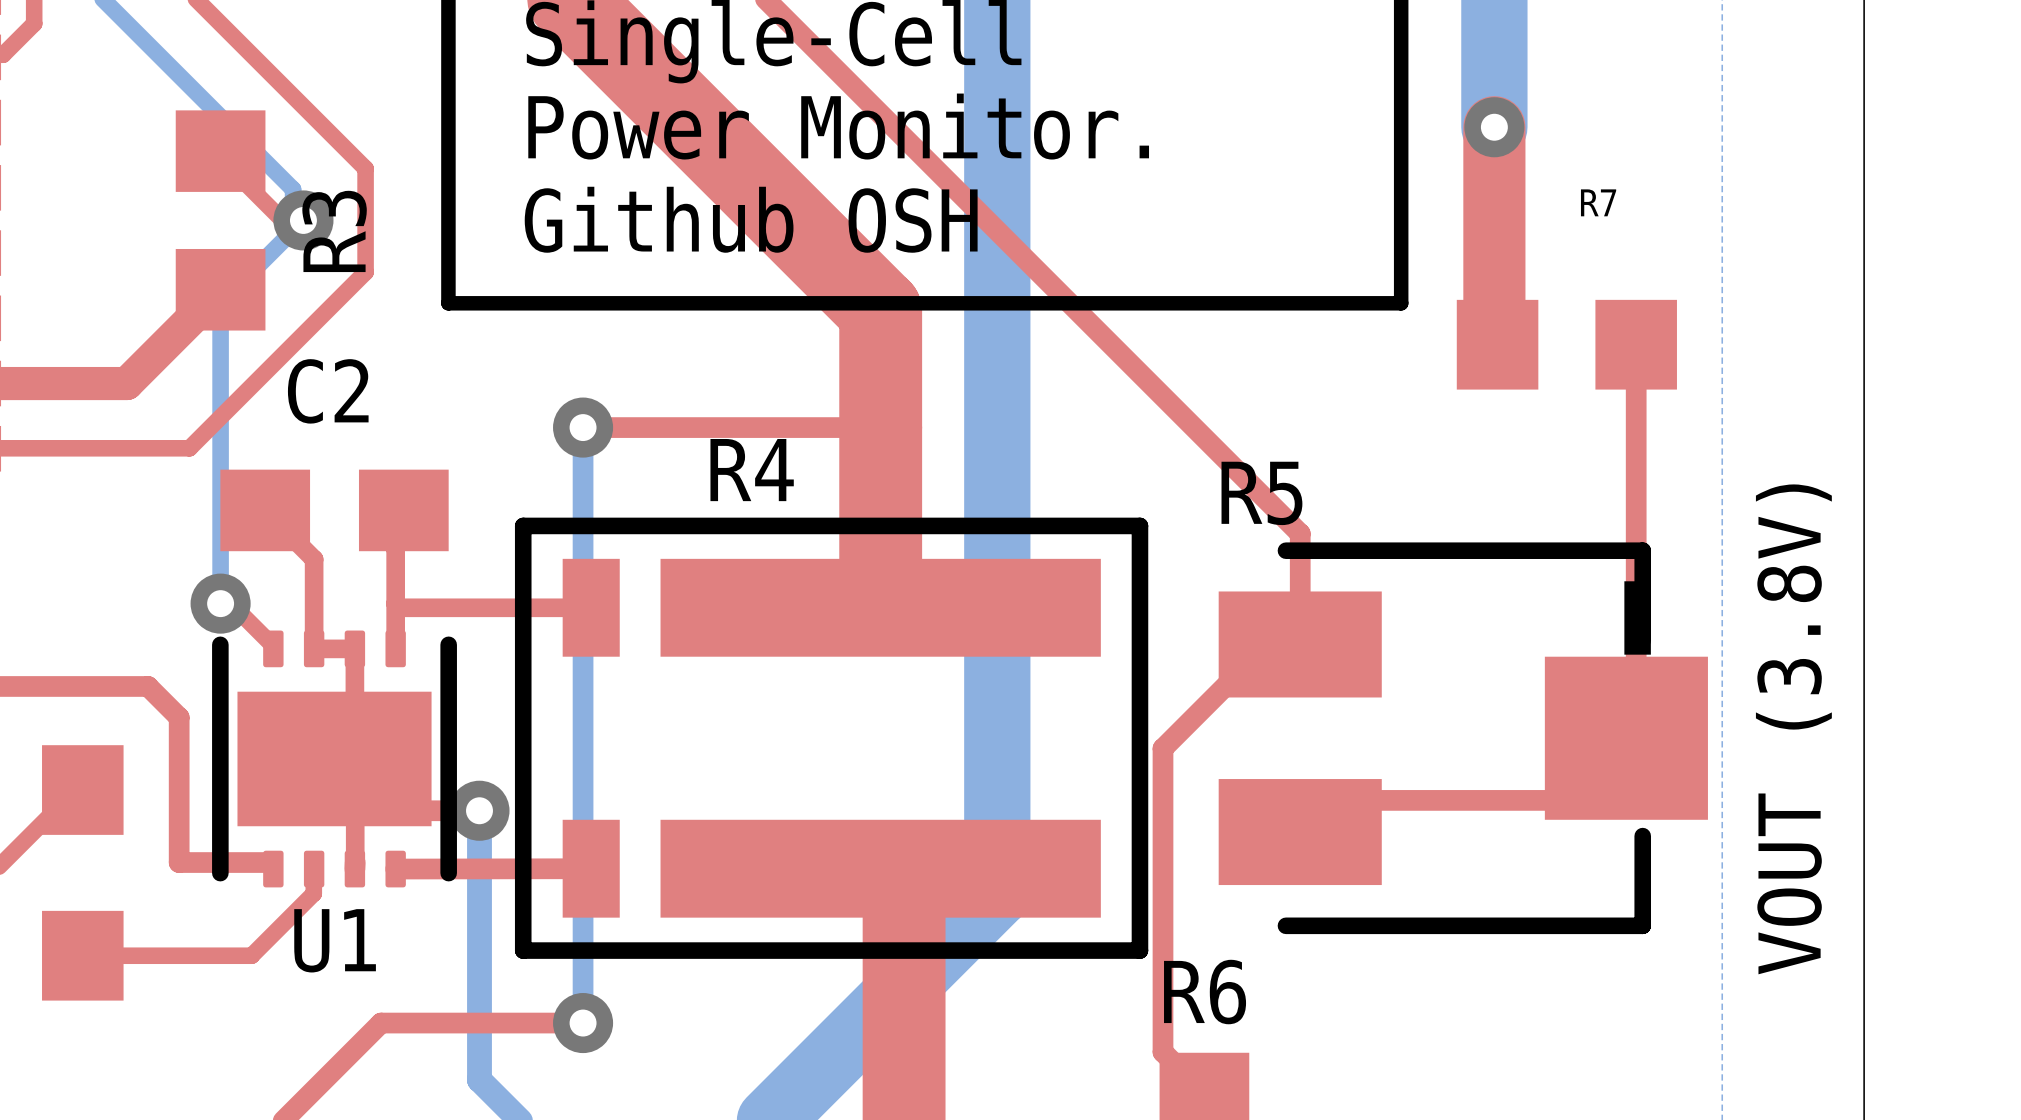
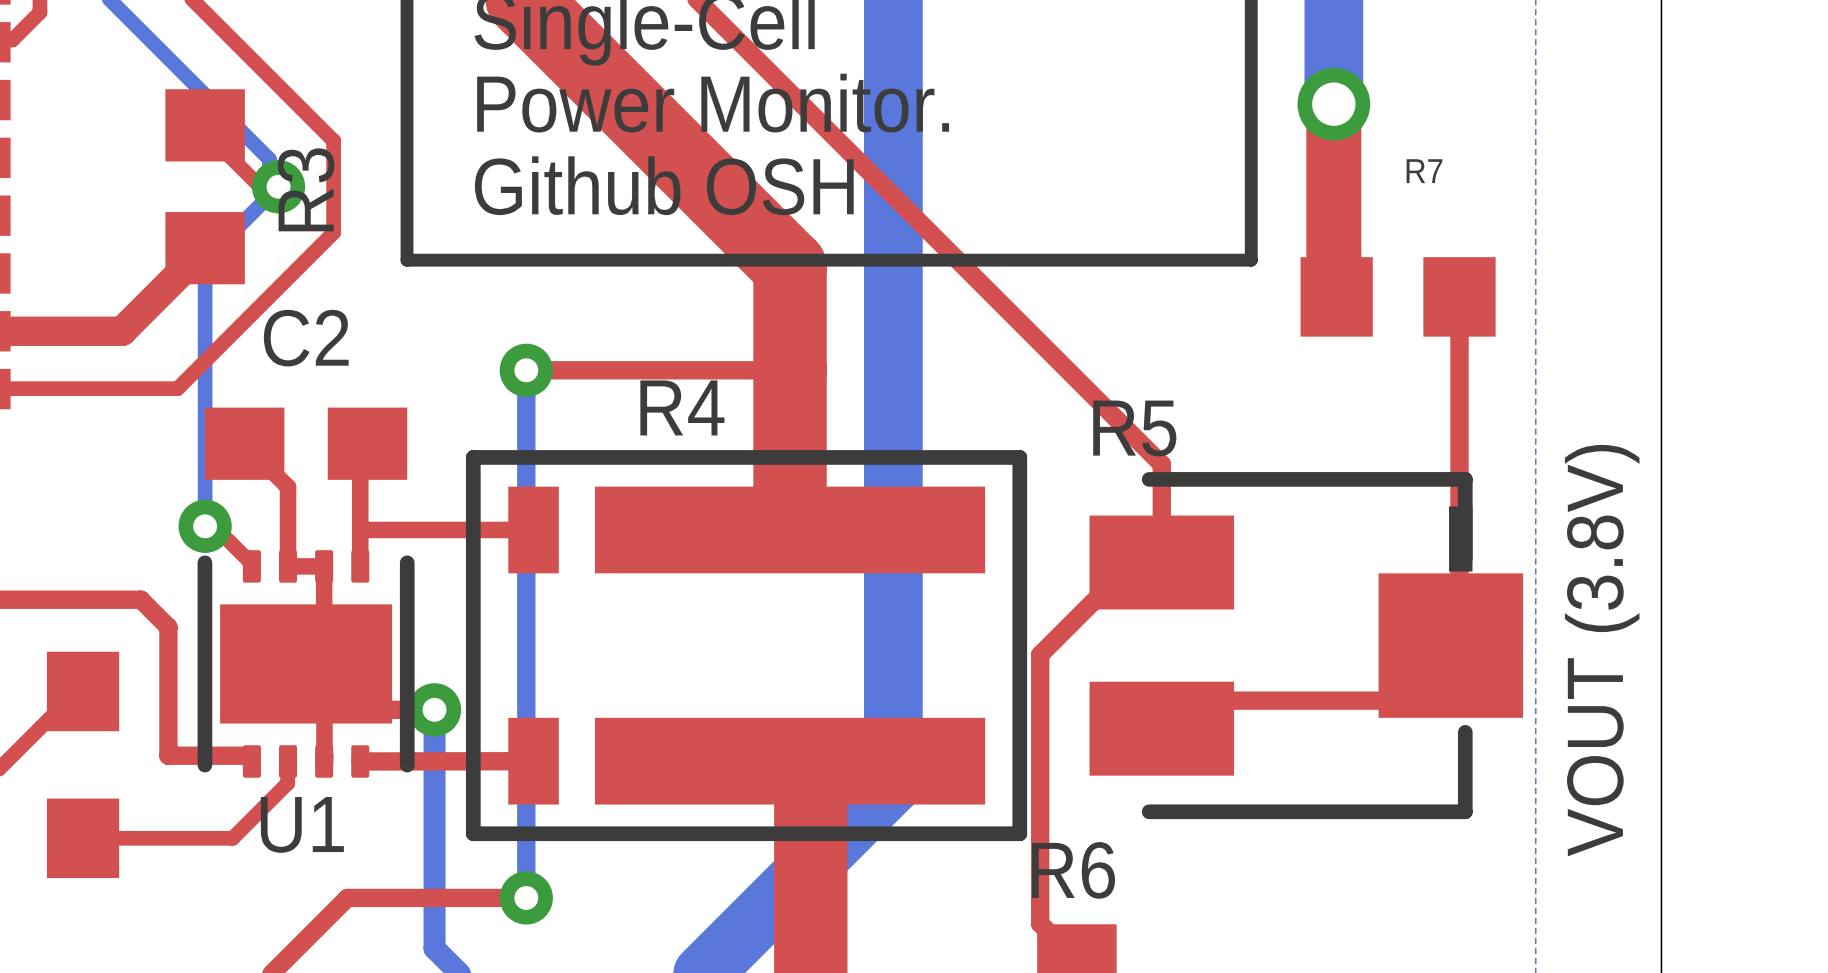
via size: [1464, 97, 1525, 158] -> [1297, 67, 1371, 141]

